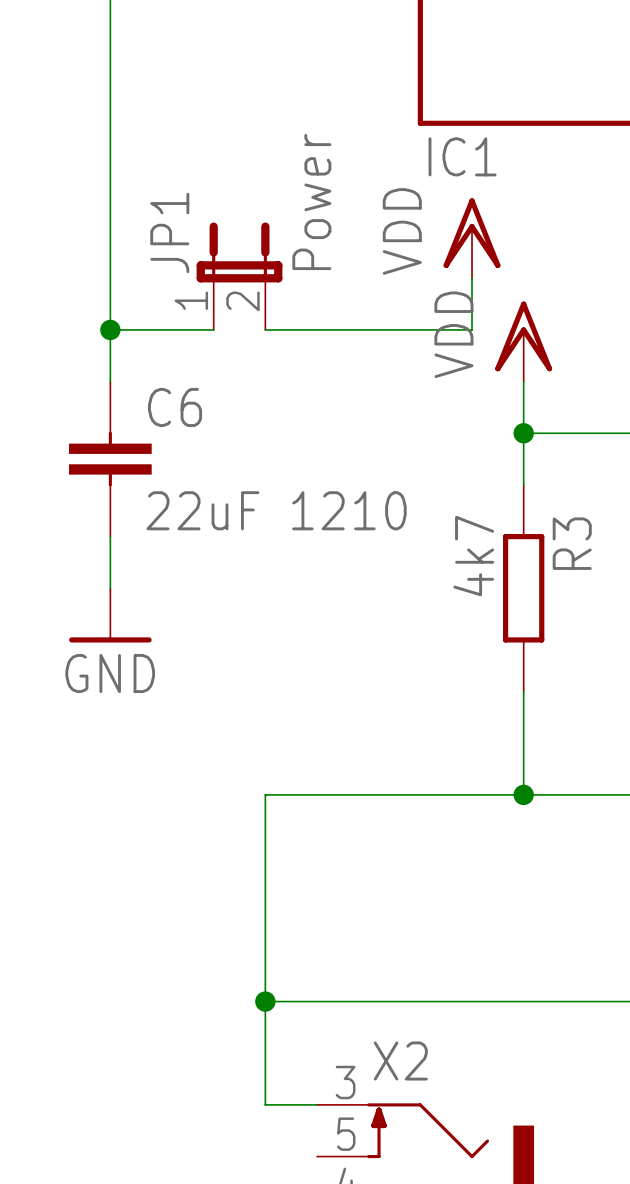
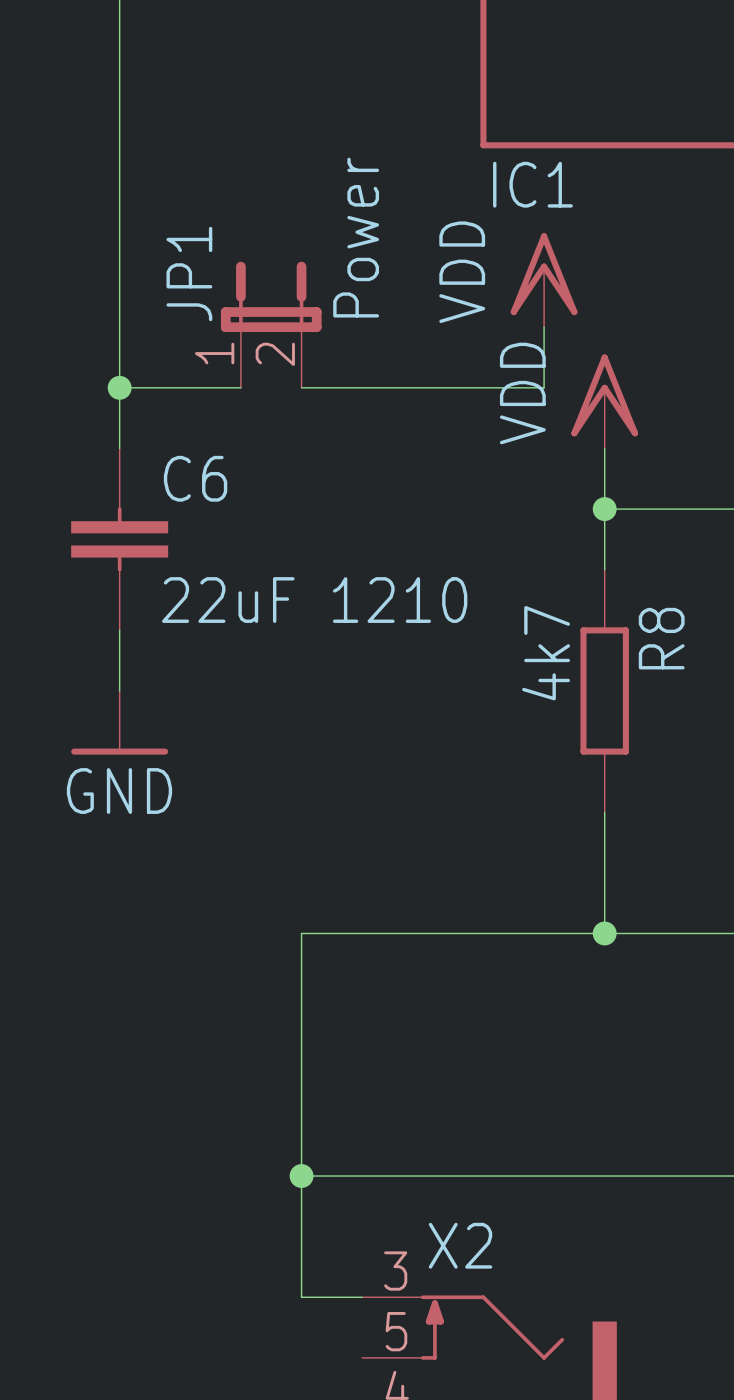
R3 name: R3 (572, 543) -> R8 (661, 638)

